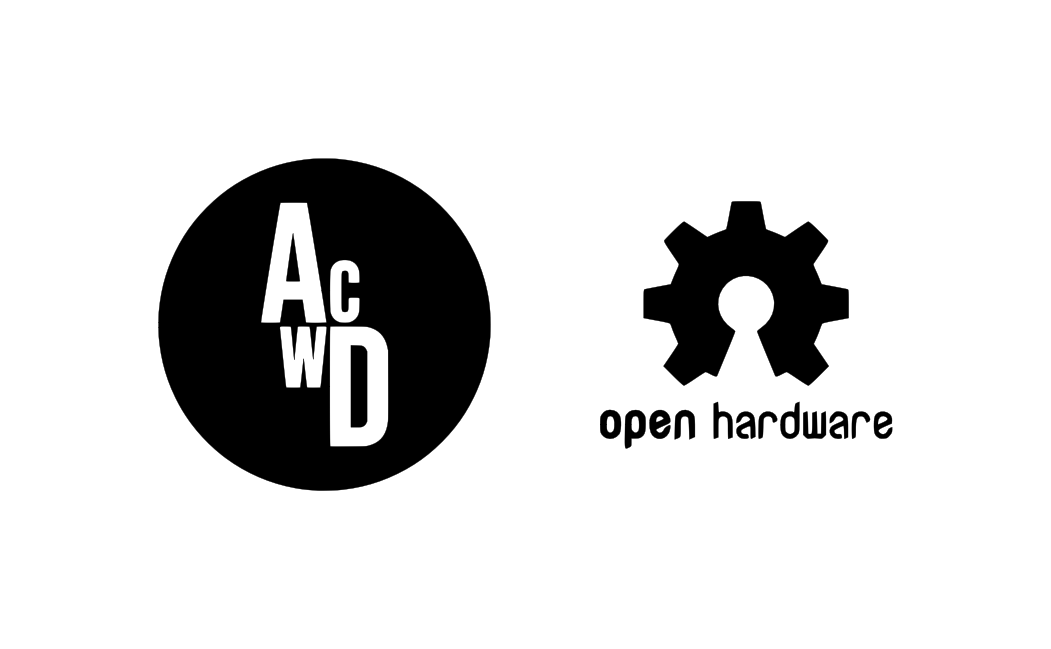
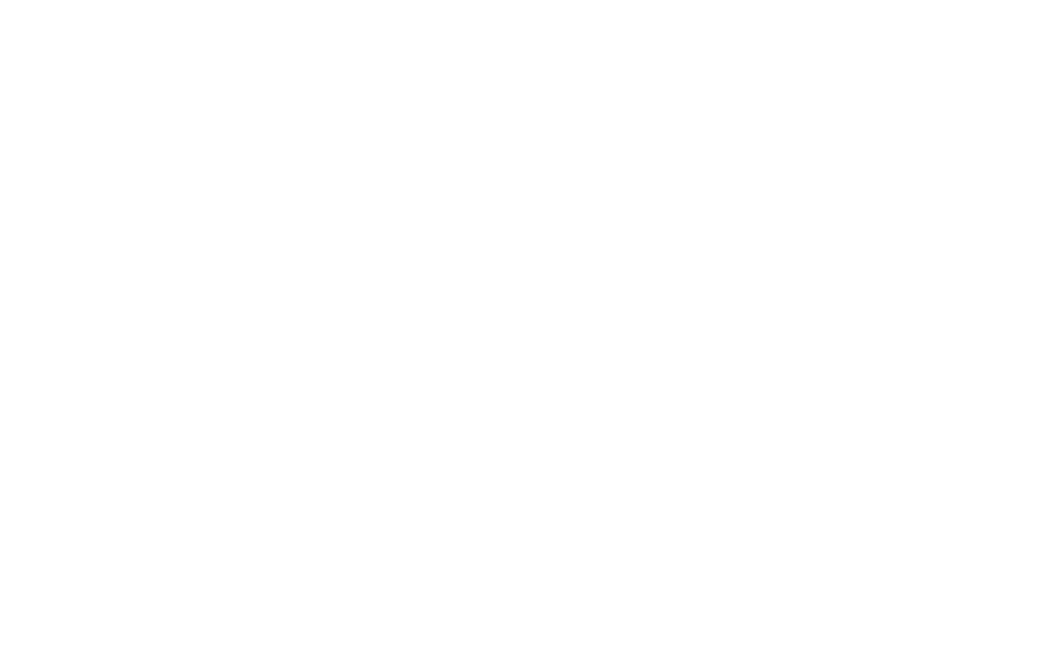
drawing: [158, 158, 491, 491] -> none
drawing: [600, 201, 893, 449] -> none

